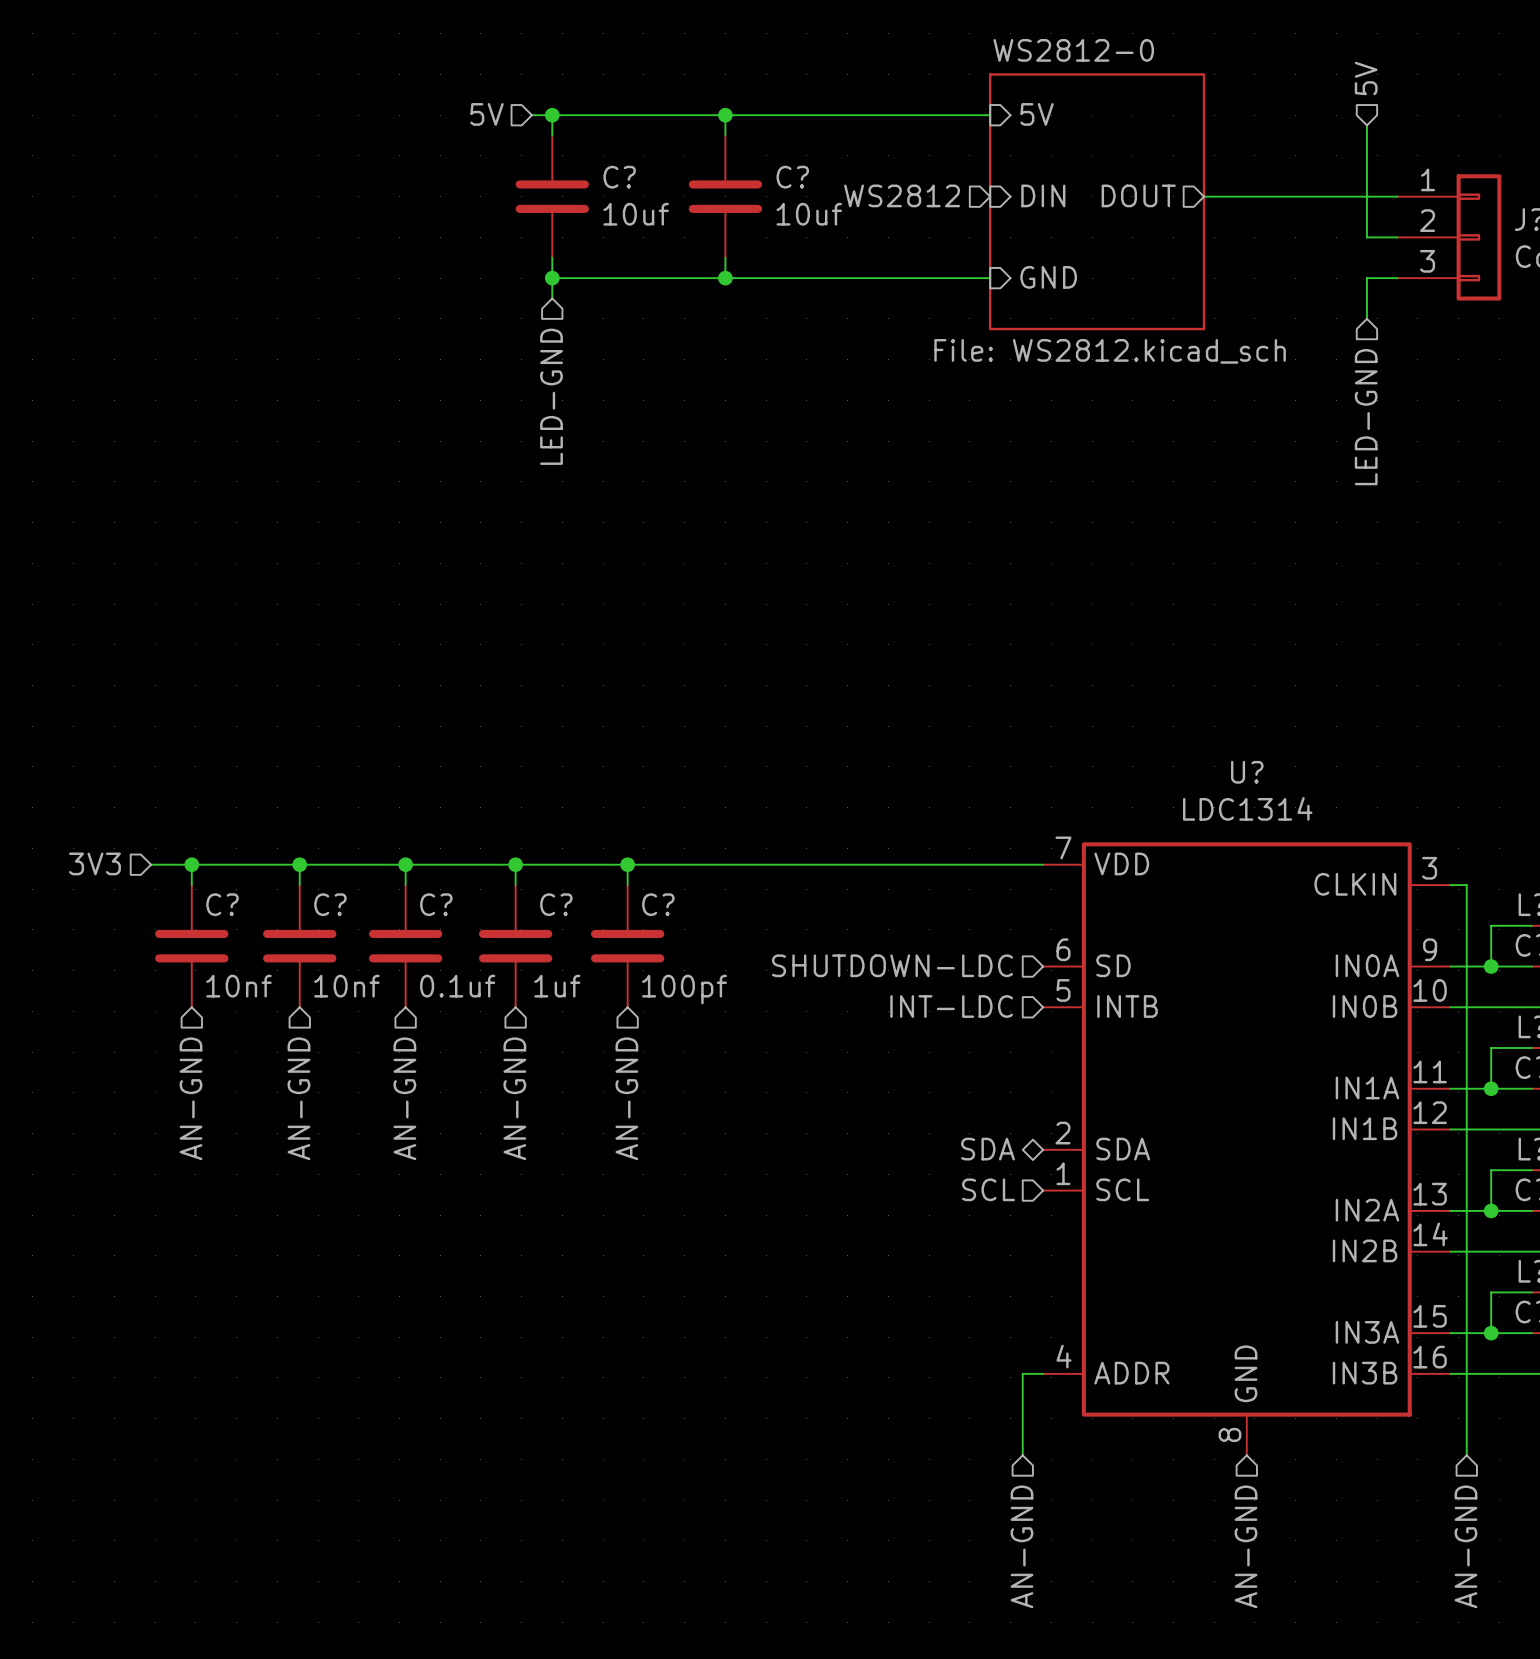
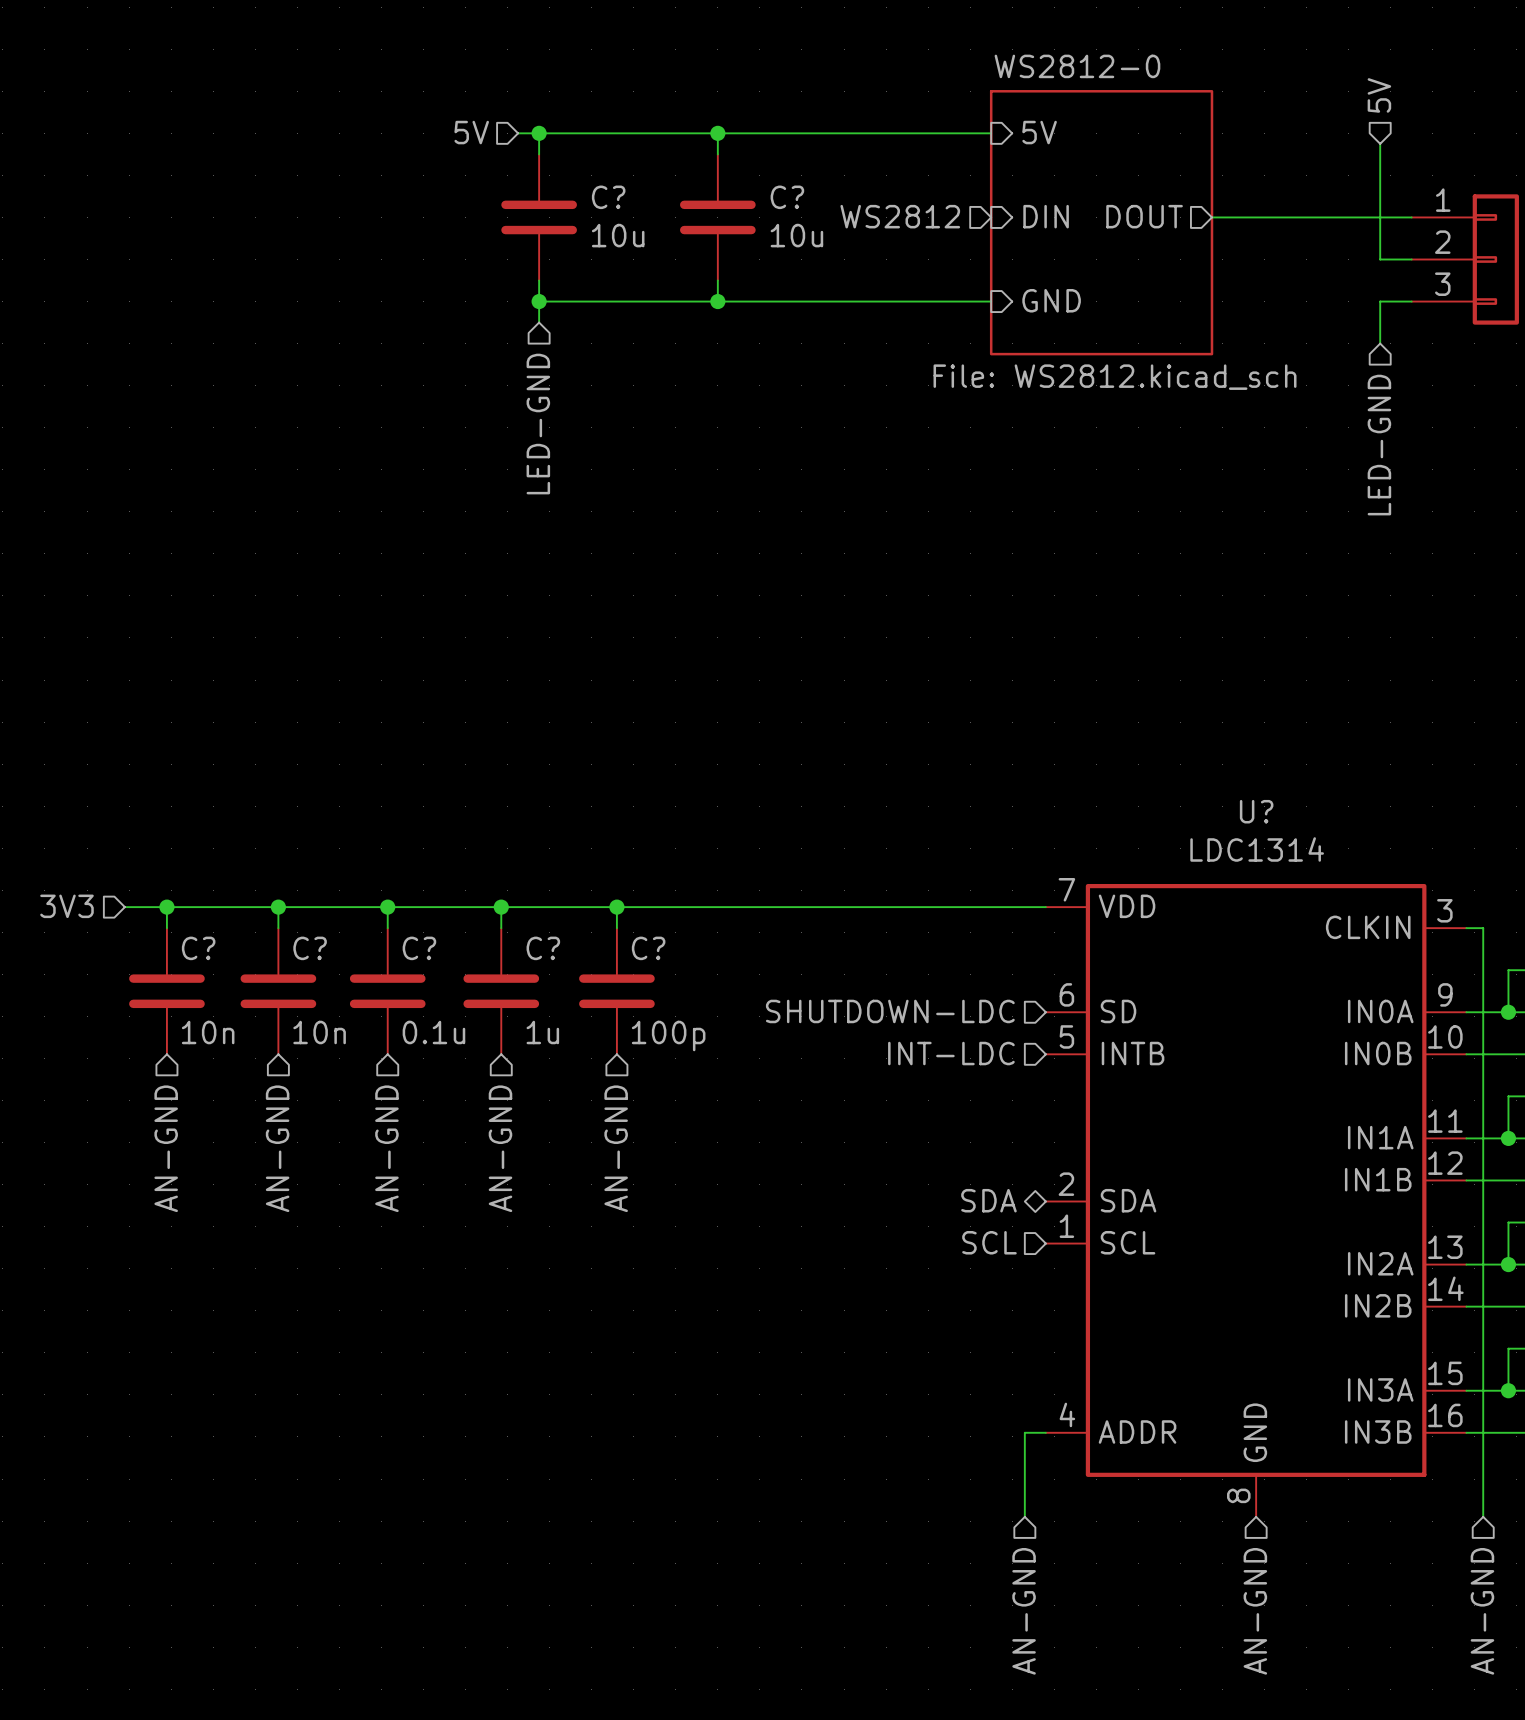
C? value: 10uf (636, 214) -> 10u (618, 235)
C? value: 10uf (809, 214) -> 10u (796, 235)
C? value: 10nf (238, 986) -> 10n (208, 1032)
C? value: 10nf (346, 986) -> 10n (319, 1032)
C? value: 0.1uf (457, 986) -> 0.1u (433, 1032)
C? value: 1uf (557, 986) -> 1u (542, 1032)
C? value: 100pf (684, 989) -> 100p (668, 1036)

